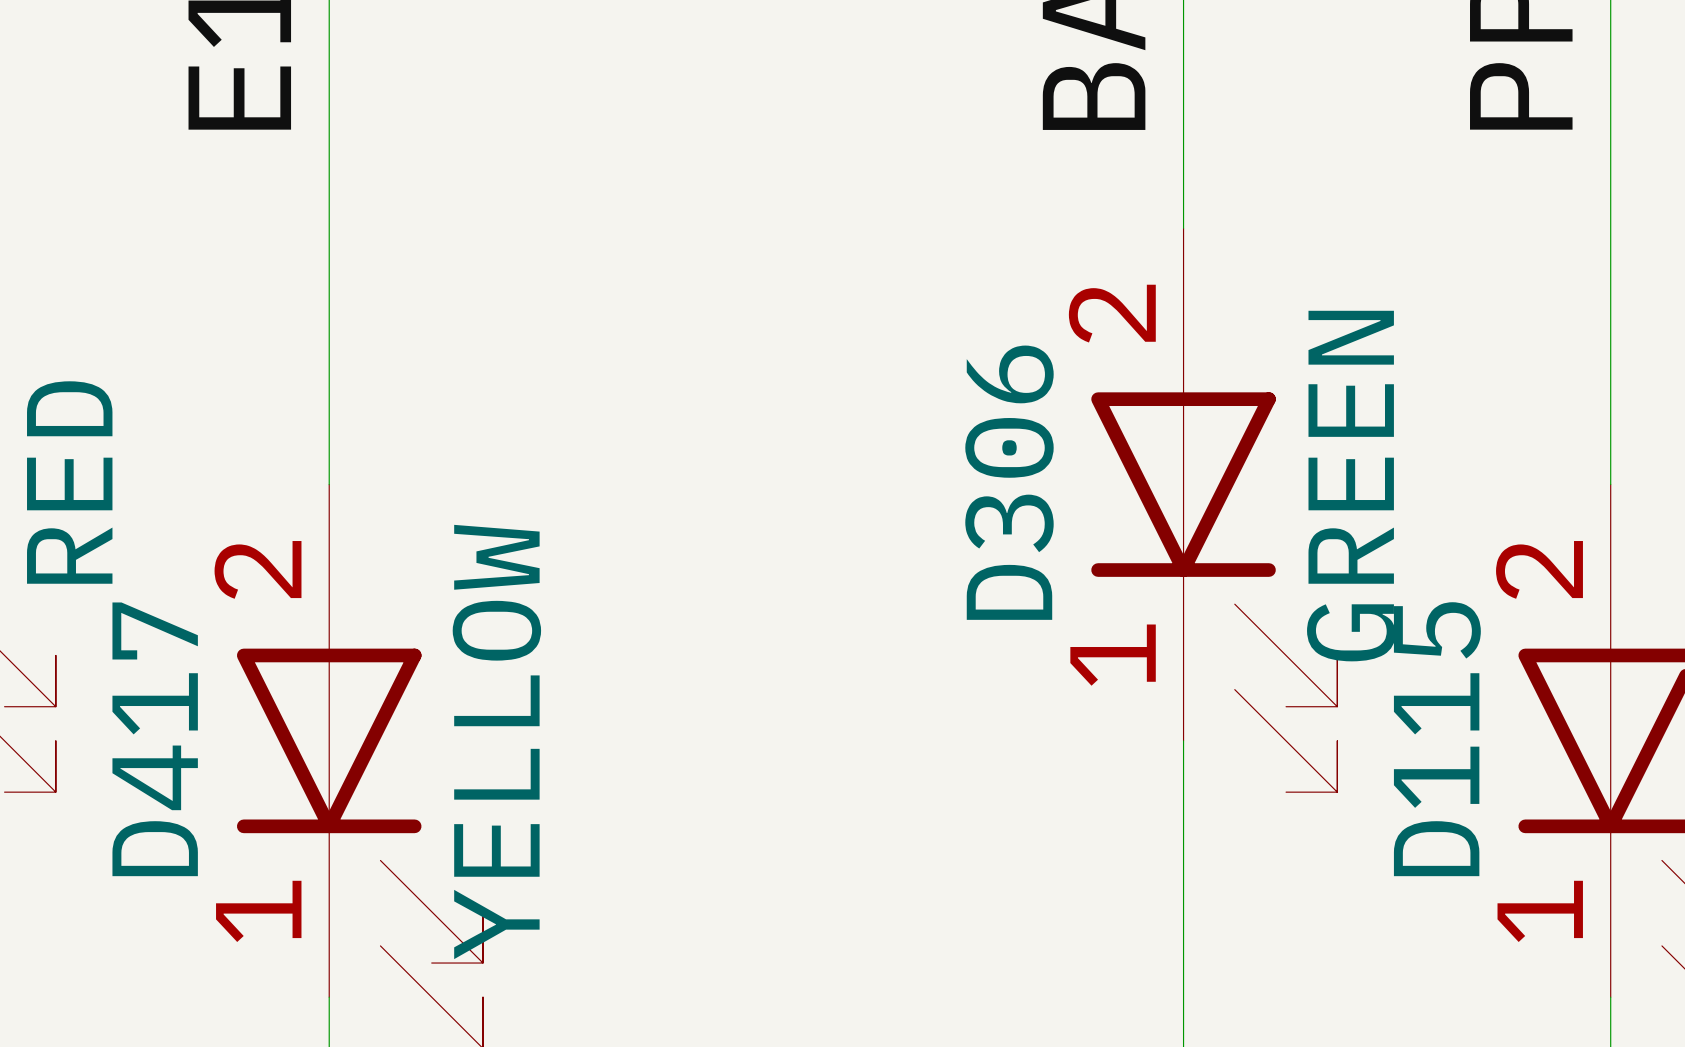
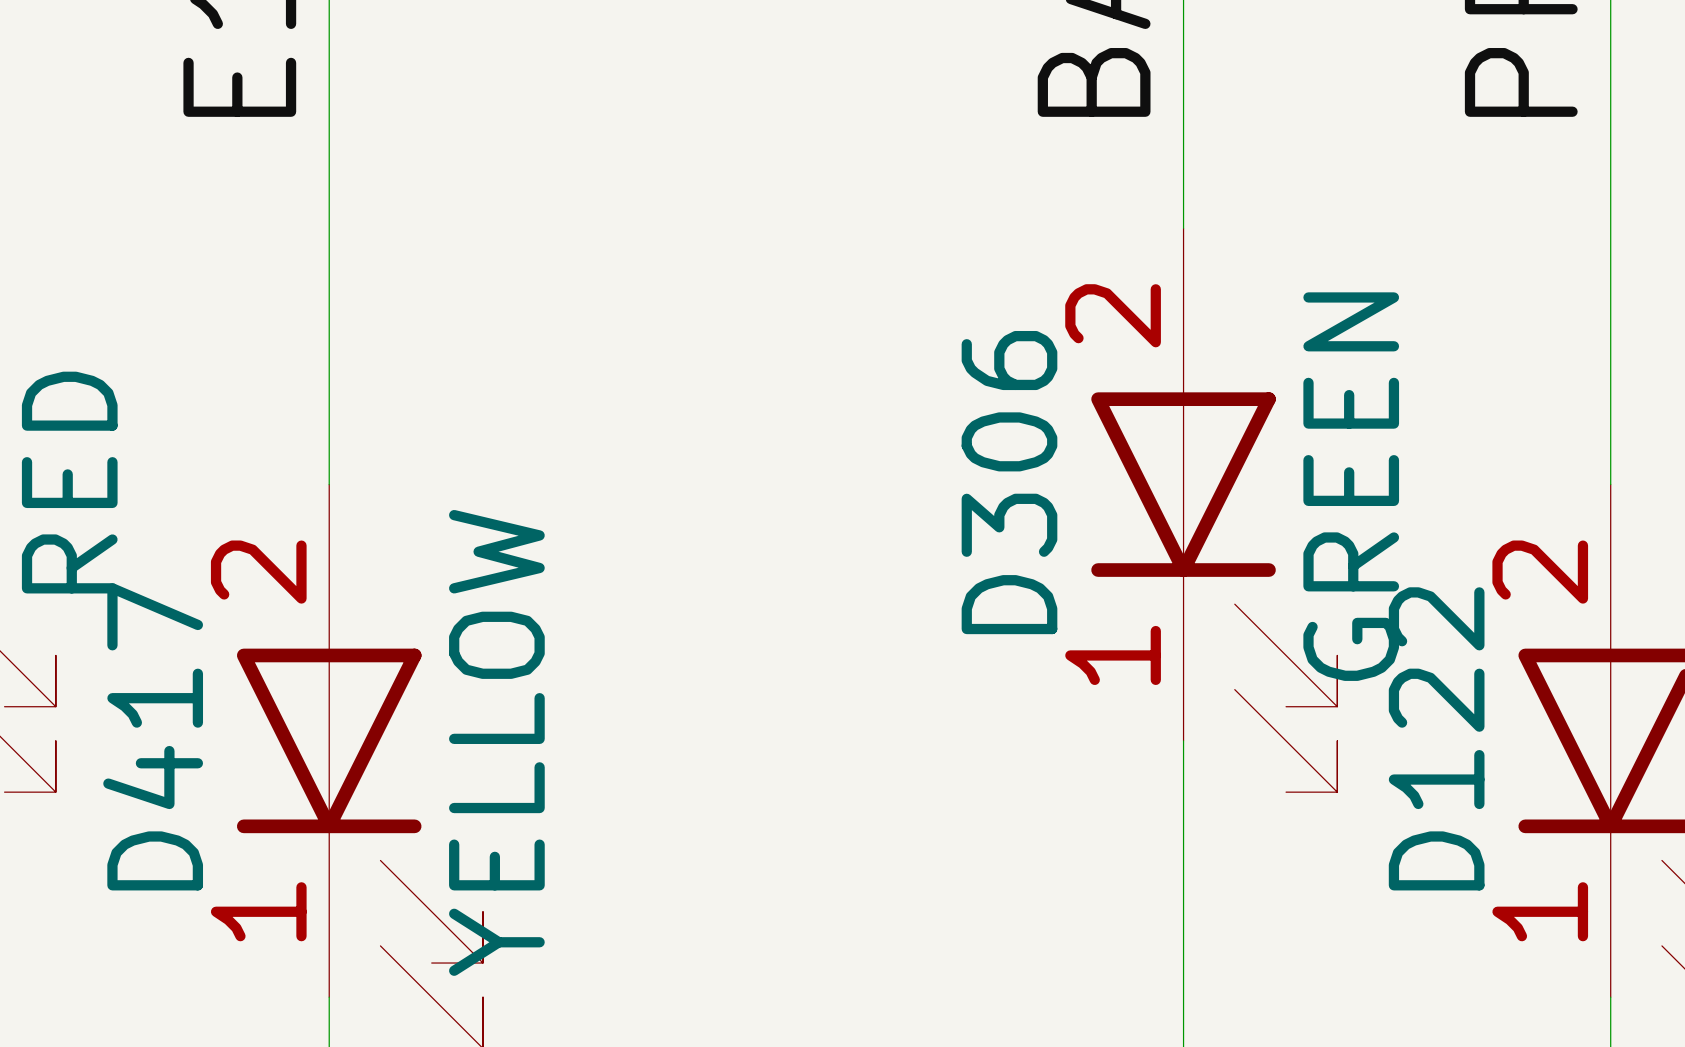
D115 name: D115 (1437, 739) -> D122 (1436, 738)

